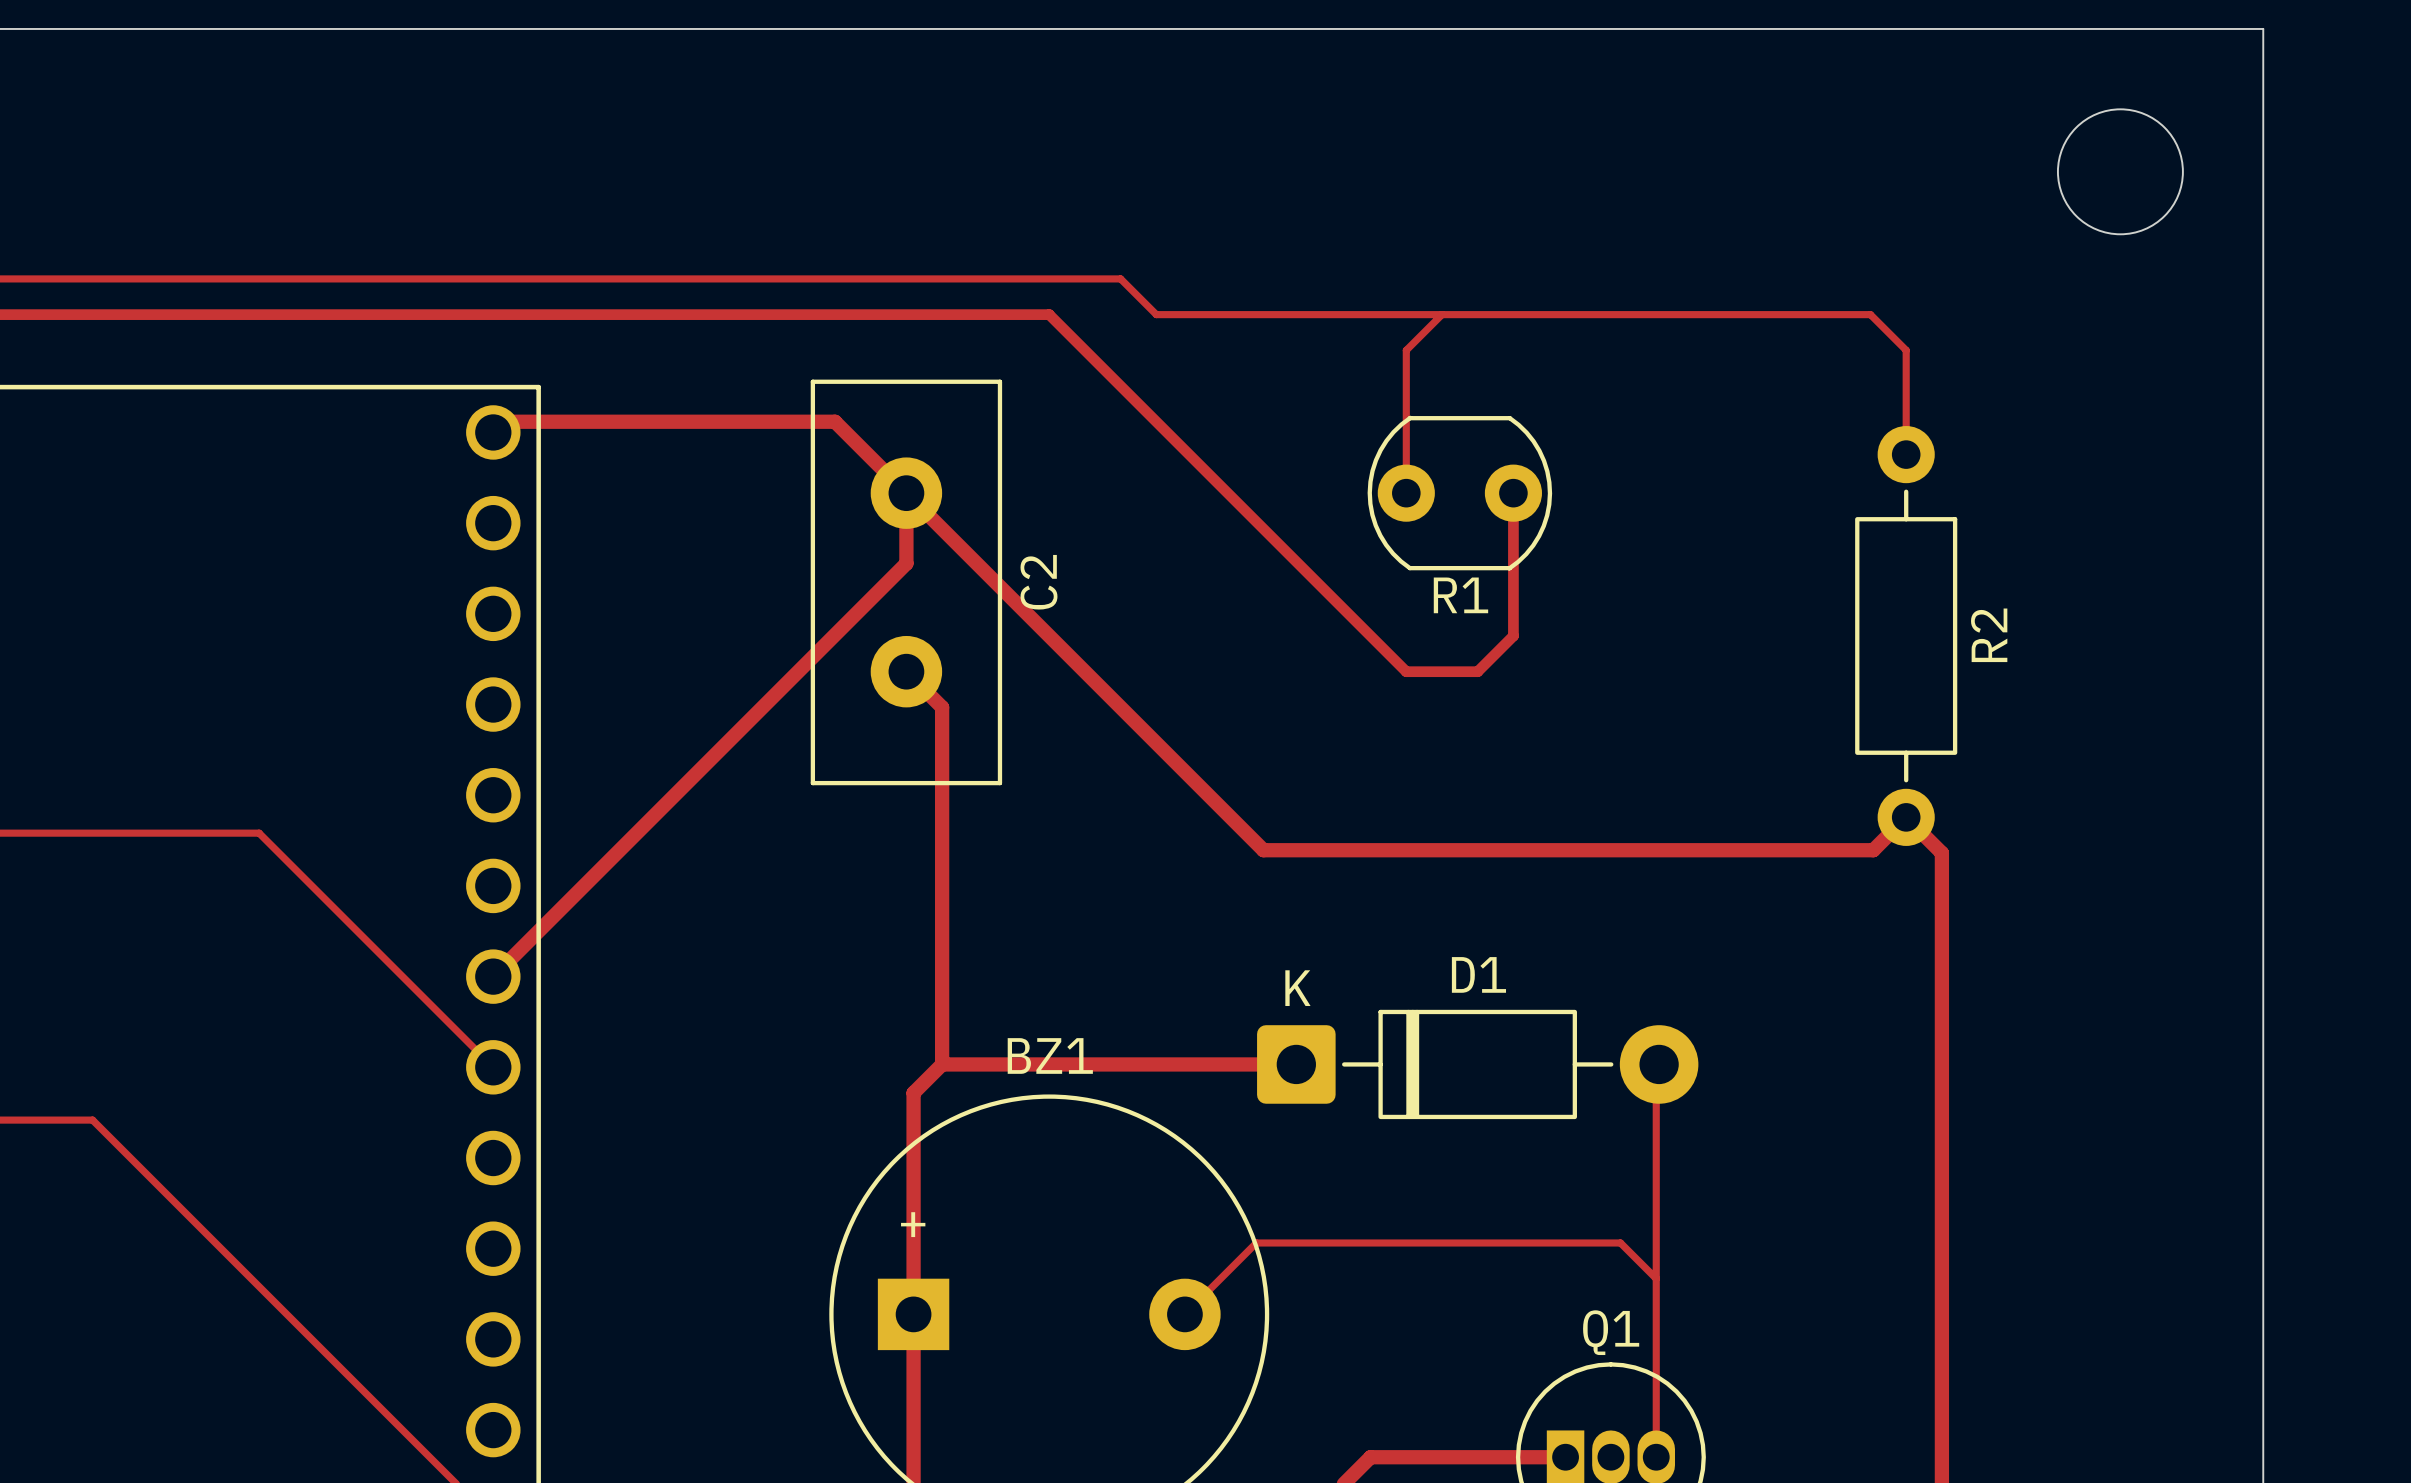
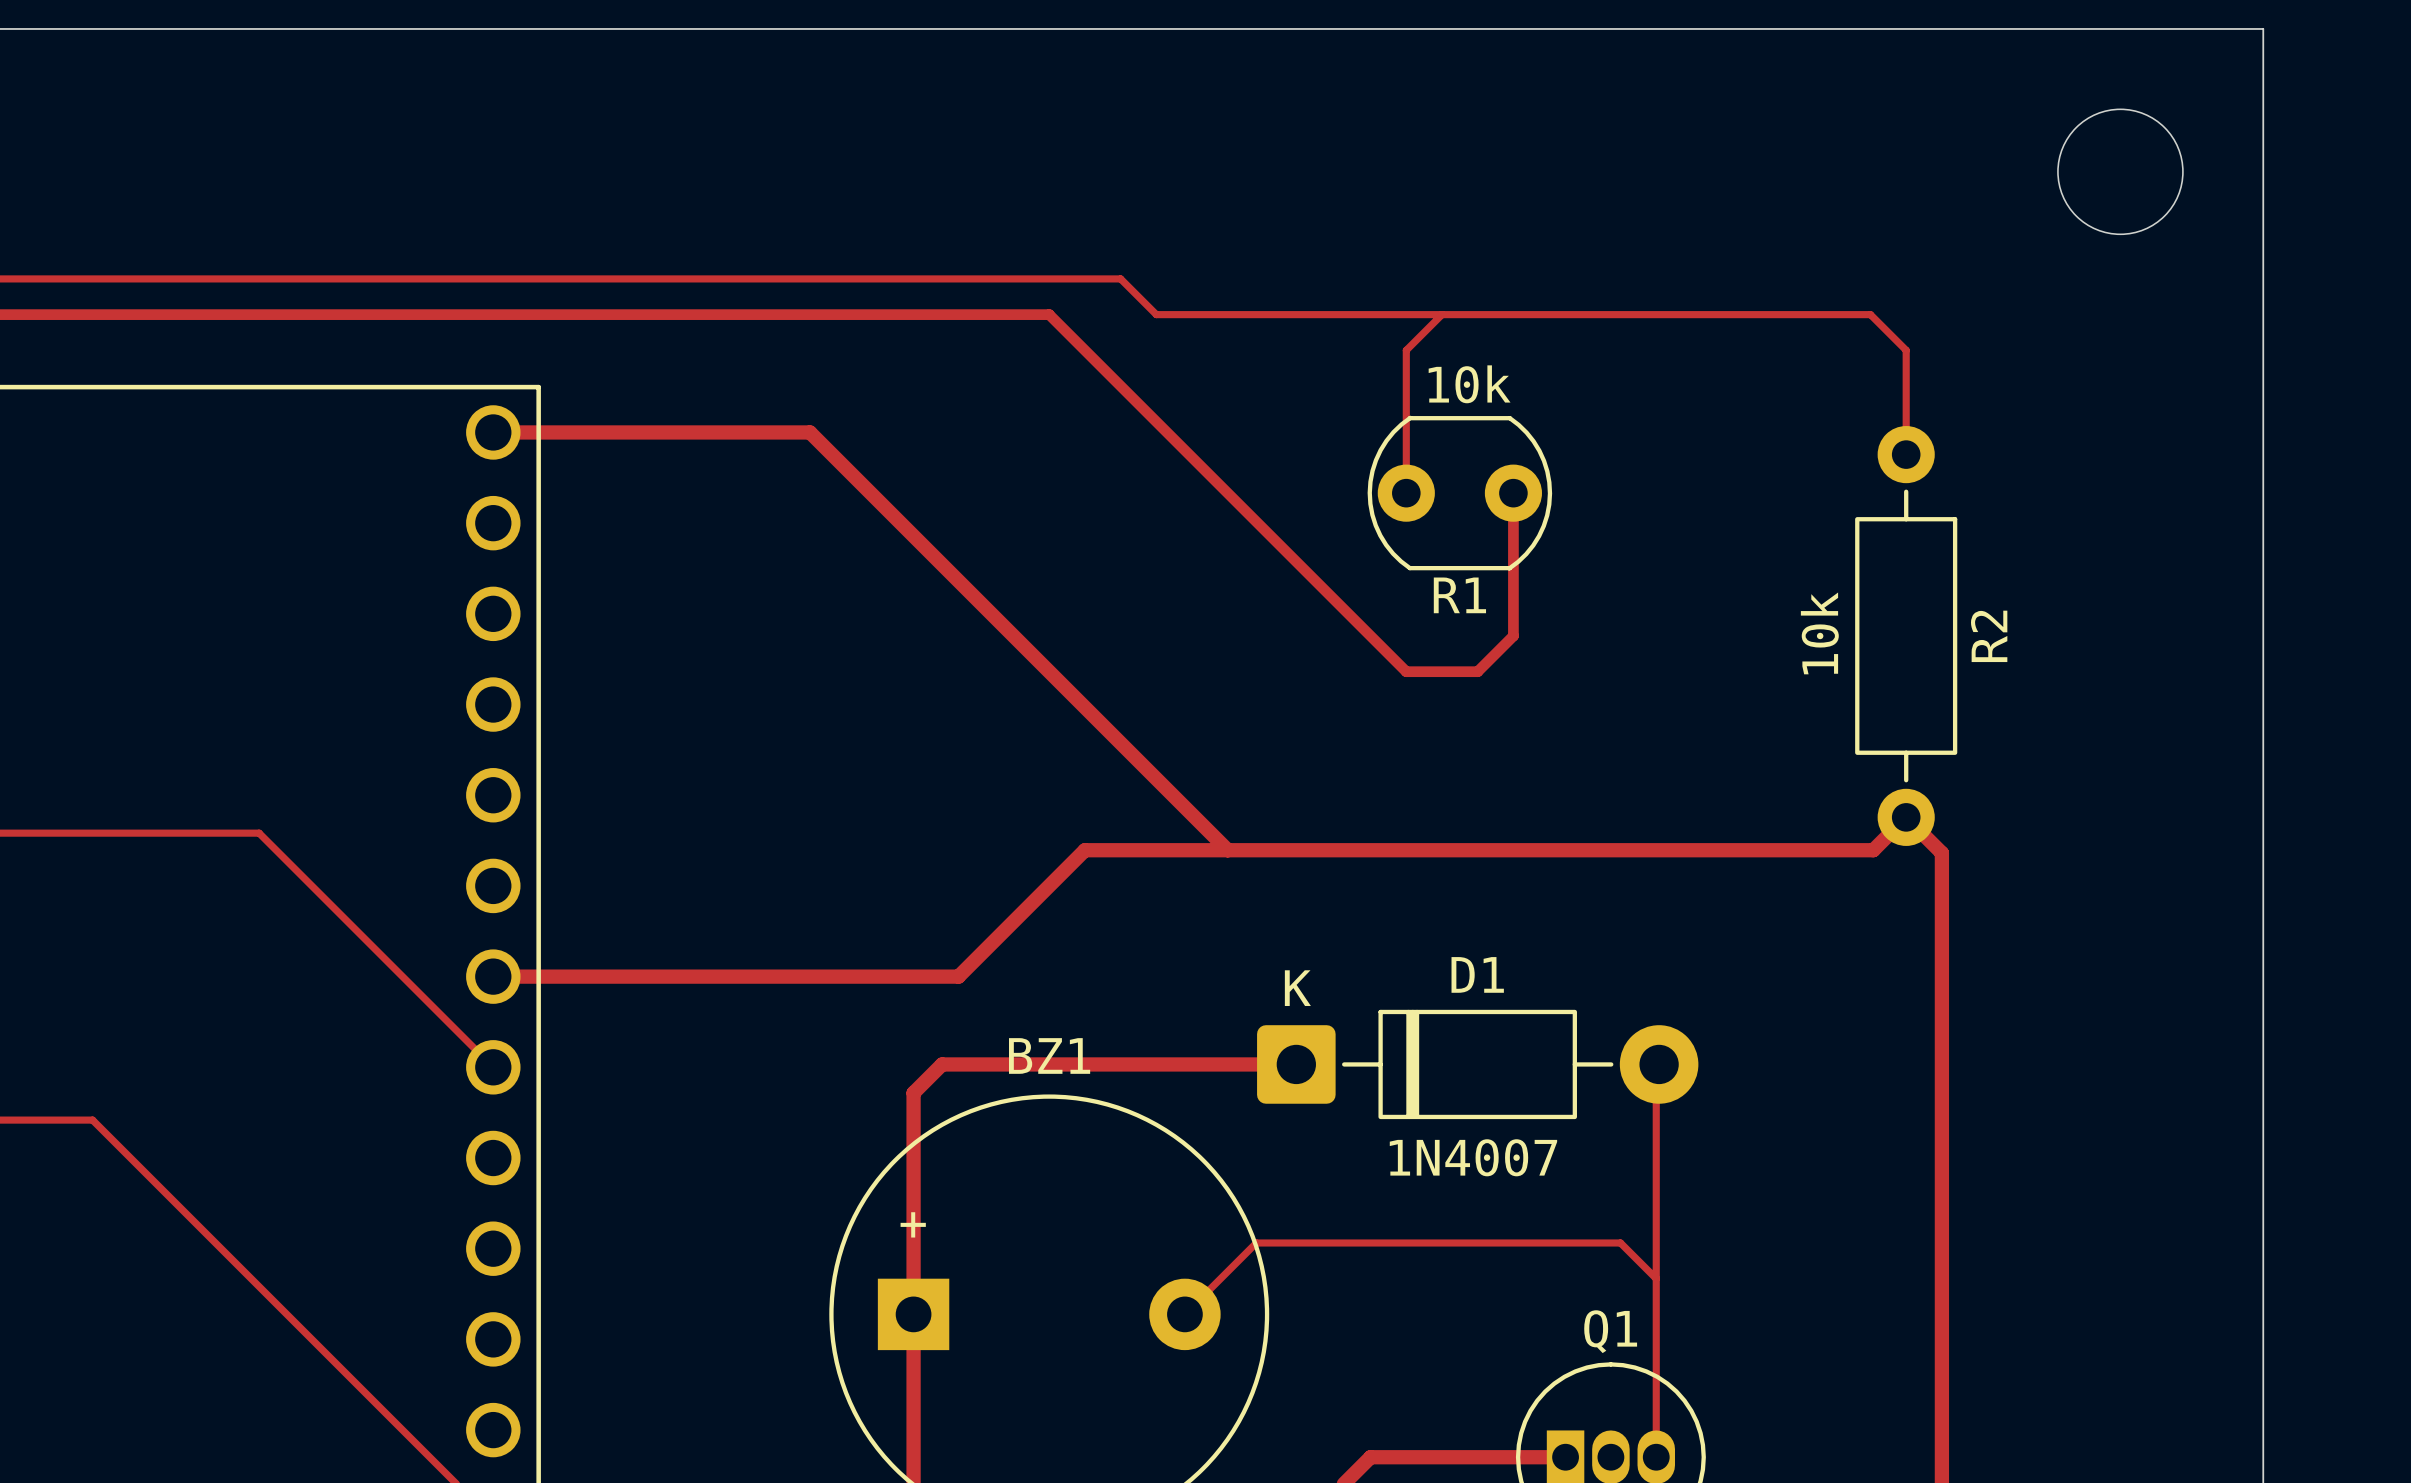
R1 value: none -> 10k (1469, 384)
track: (504, 421) (835, 421) (1263, 850) -> none
track: none -> (493, 432) (810, 432) (1227, 850)
track: (906, 493) (906, 563) (493, 976) -> (1263, 850) (1084, 850) (958, 976) (493, 976)
C2: (906, 582) -> none
R2 value: none -> 10k (1819, 633)
track: (906, 671) (942, 707) (942, 1064) -> none
D1 value: none -> 1N4007 (1473, 1157)

